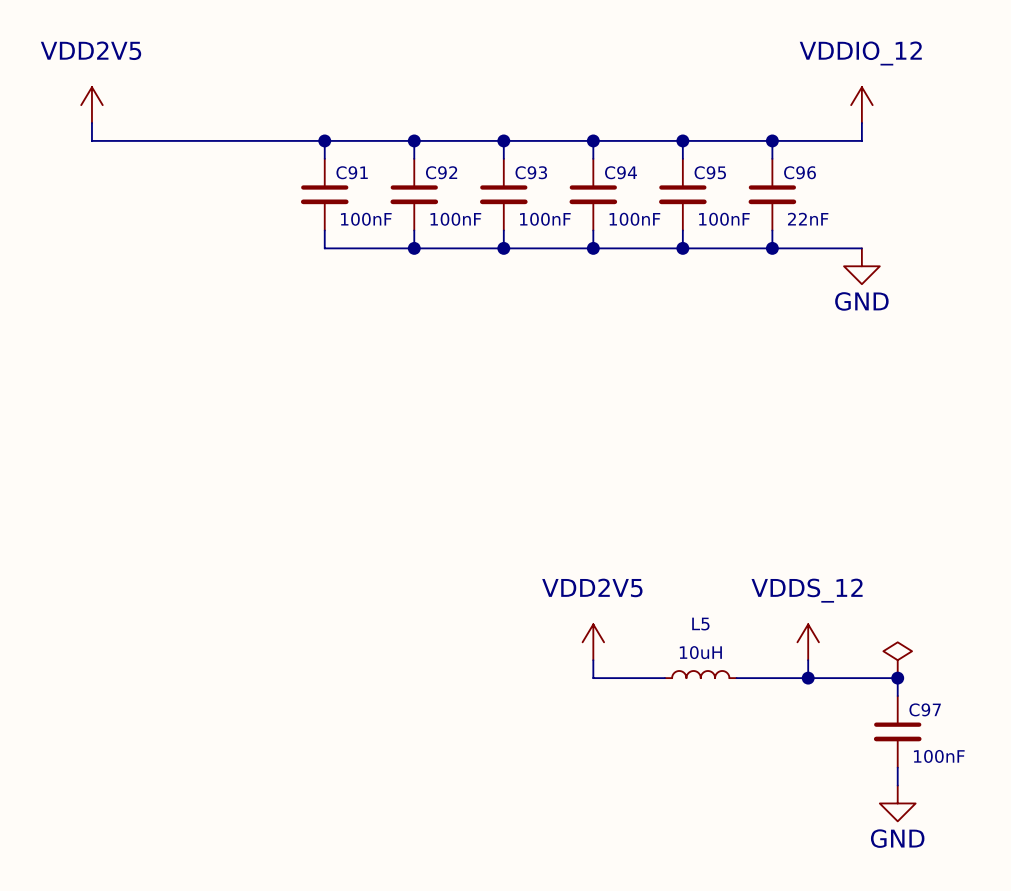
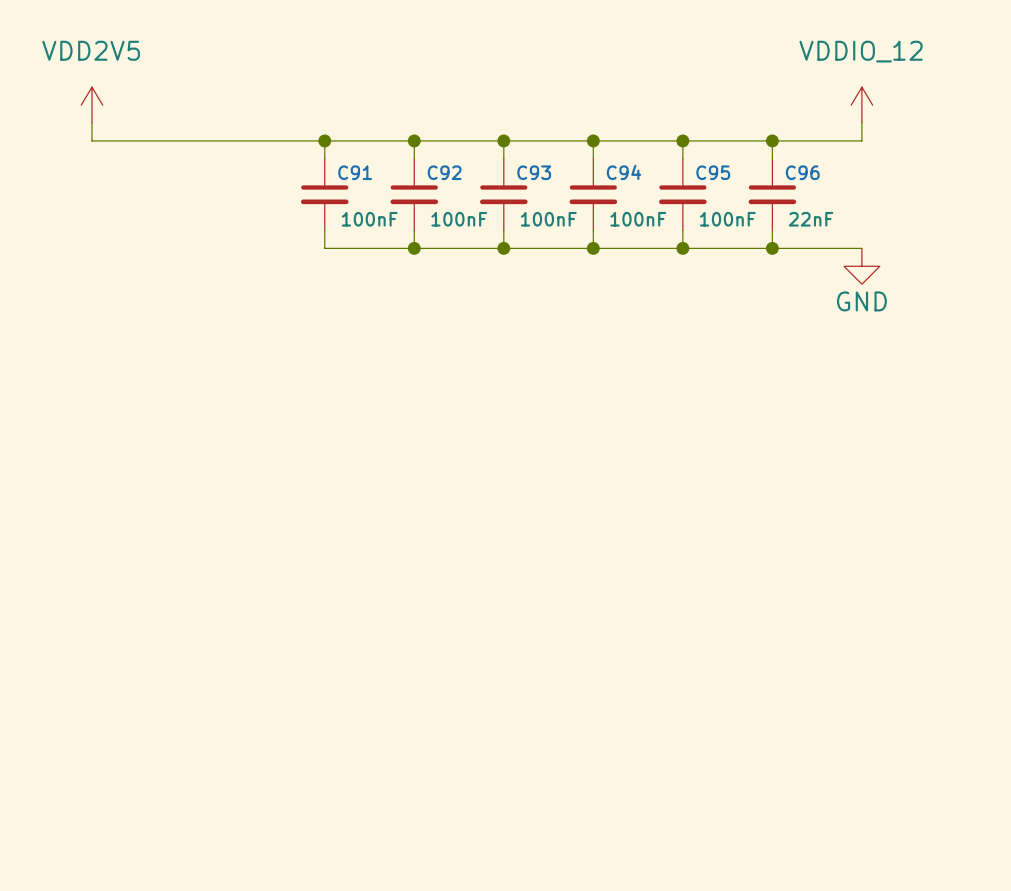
power symbol: VDD2V5 (593, 642) -> none
power symbol: VDDS_12 (808, 642) -> none
wire: (593, 660) (593, 678) (664, 678) -> none
wire: (808, 660) (808, 678) -> none
power symbol: (897, 660) -> none
L5: 10uH (700, 674) -> none
wire: (736, 678) (897, 678) (897, 696) -> none
junction: (808, 678) -> none
junction: (897, 678) -> none
C97: 100nF (897, 731) -> none
wire: (897, 767) (897, 785) -> none
power symbol: GND (897, 803) -> none

